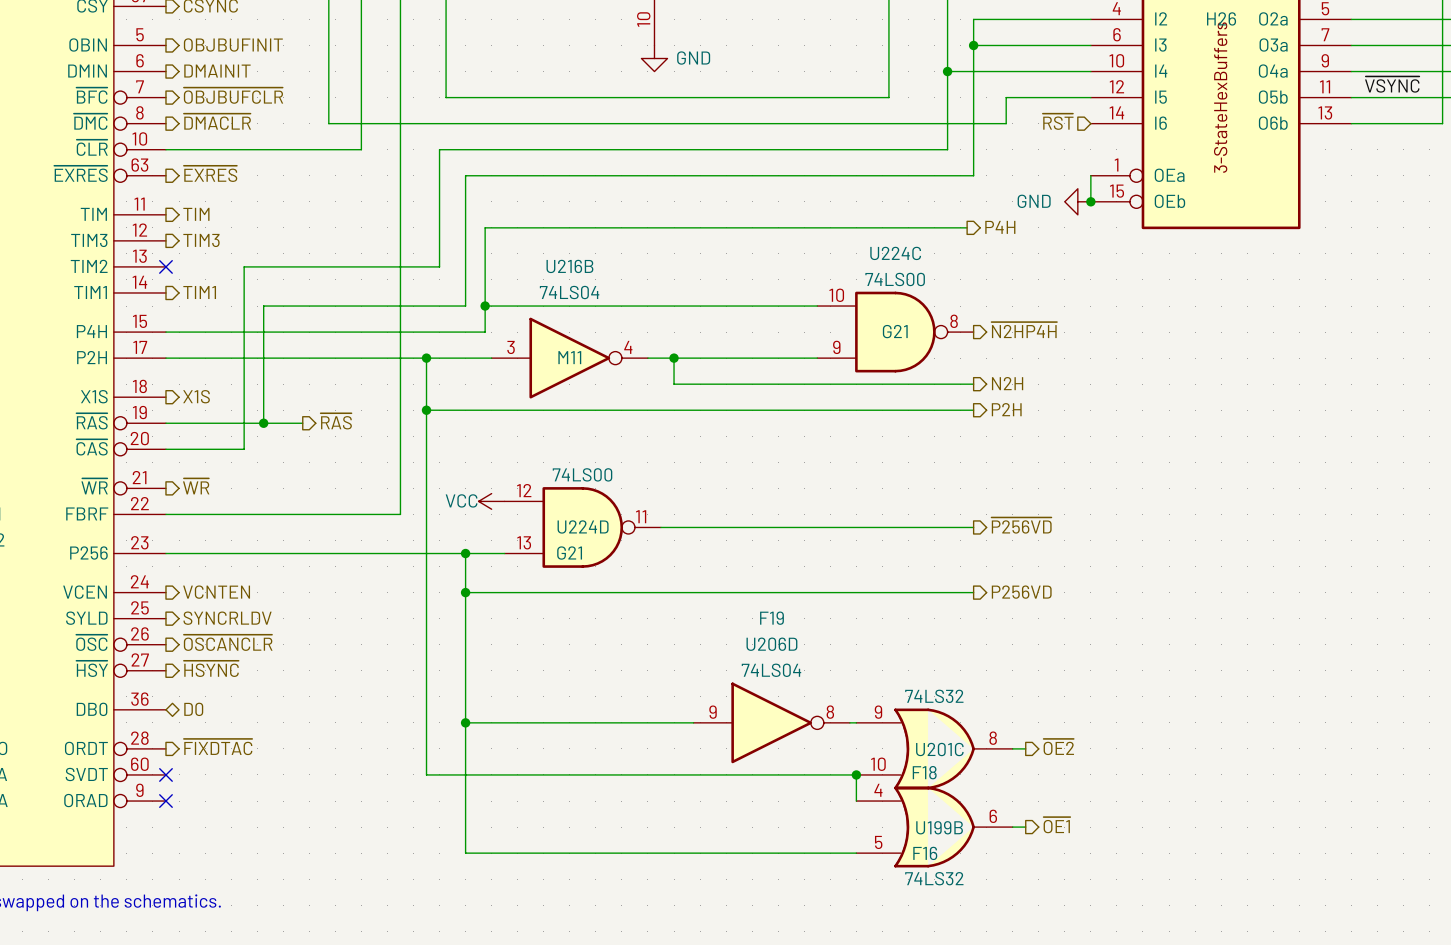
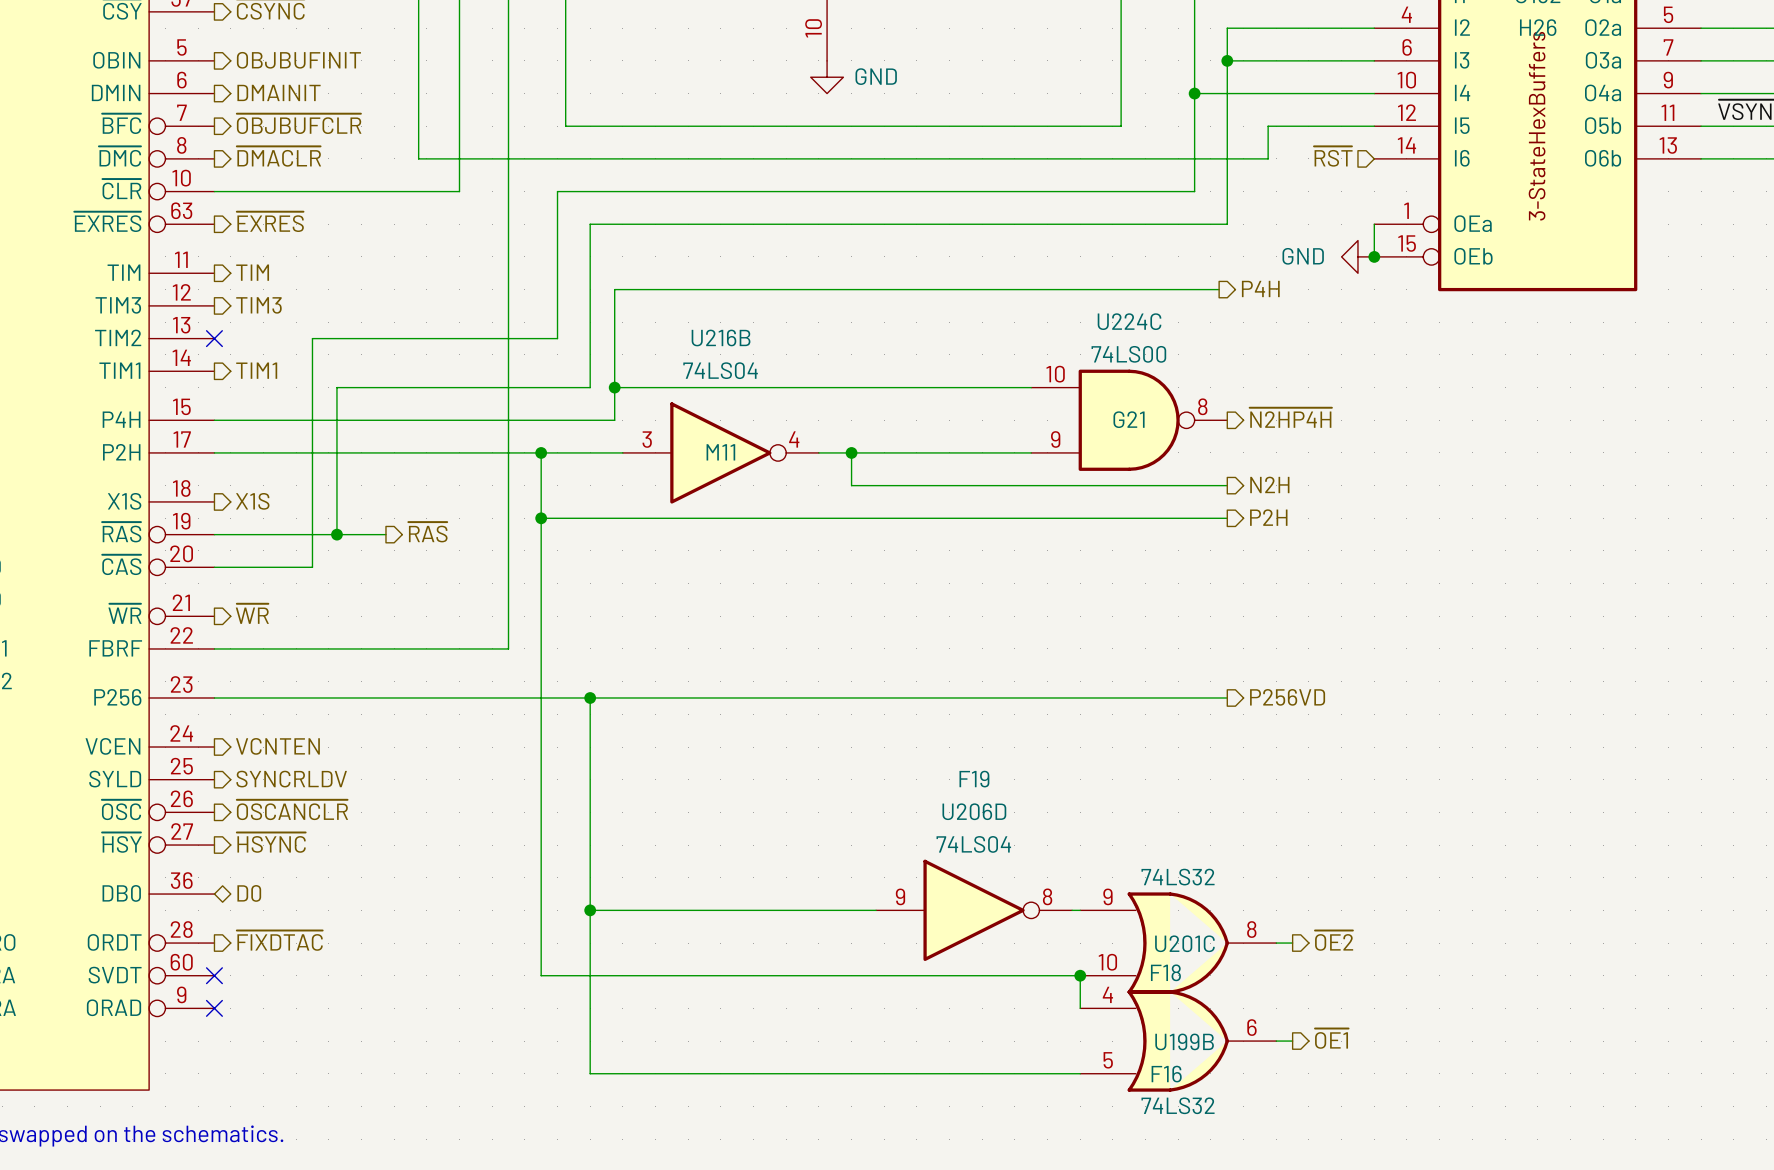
power symbol: VCC (491, 501) -> none
hierarchical label: ~{P256VD} (1021, 525) -> none
U224D: 74LS00 (582, 527) -> none
wire: (660, 527) (973, 527) -> none
wire: none -> (639, 697) (1227, 697)
wire: (465, 592) (973, 592) -> none
junction: (465, 592) -> none
hierarchical label position: P256VD (1021, 592) -> P256VD (1287, 697)

